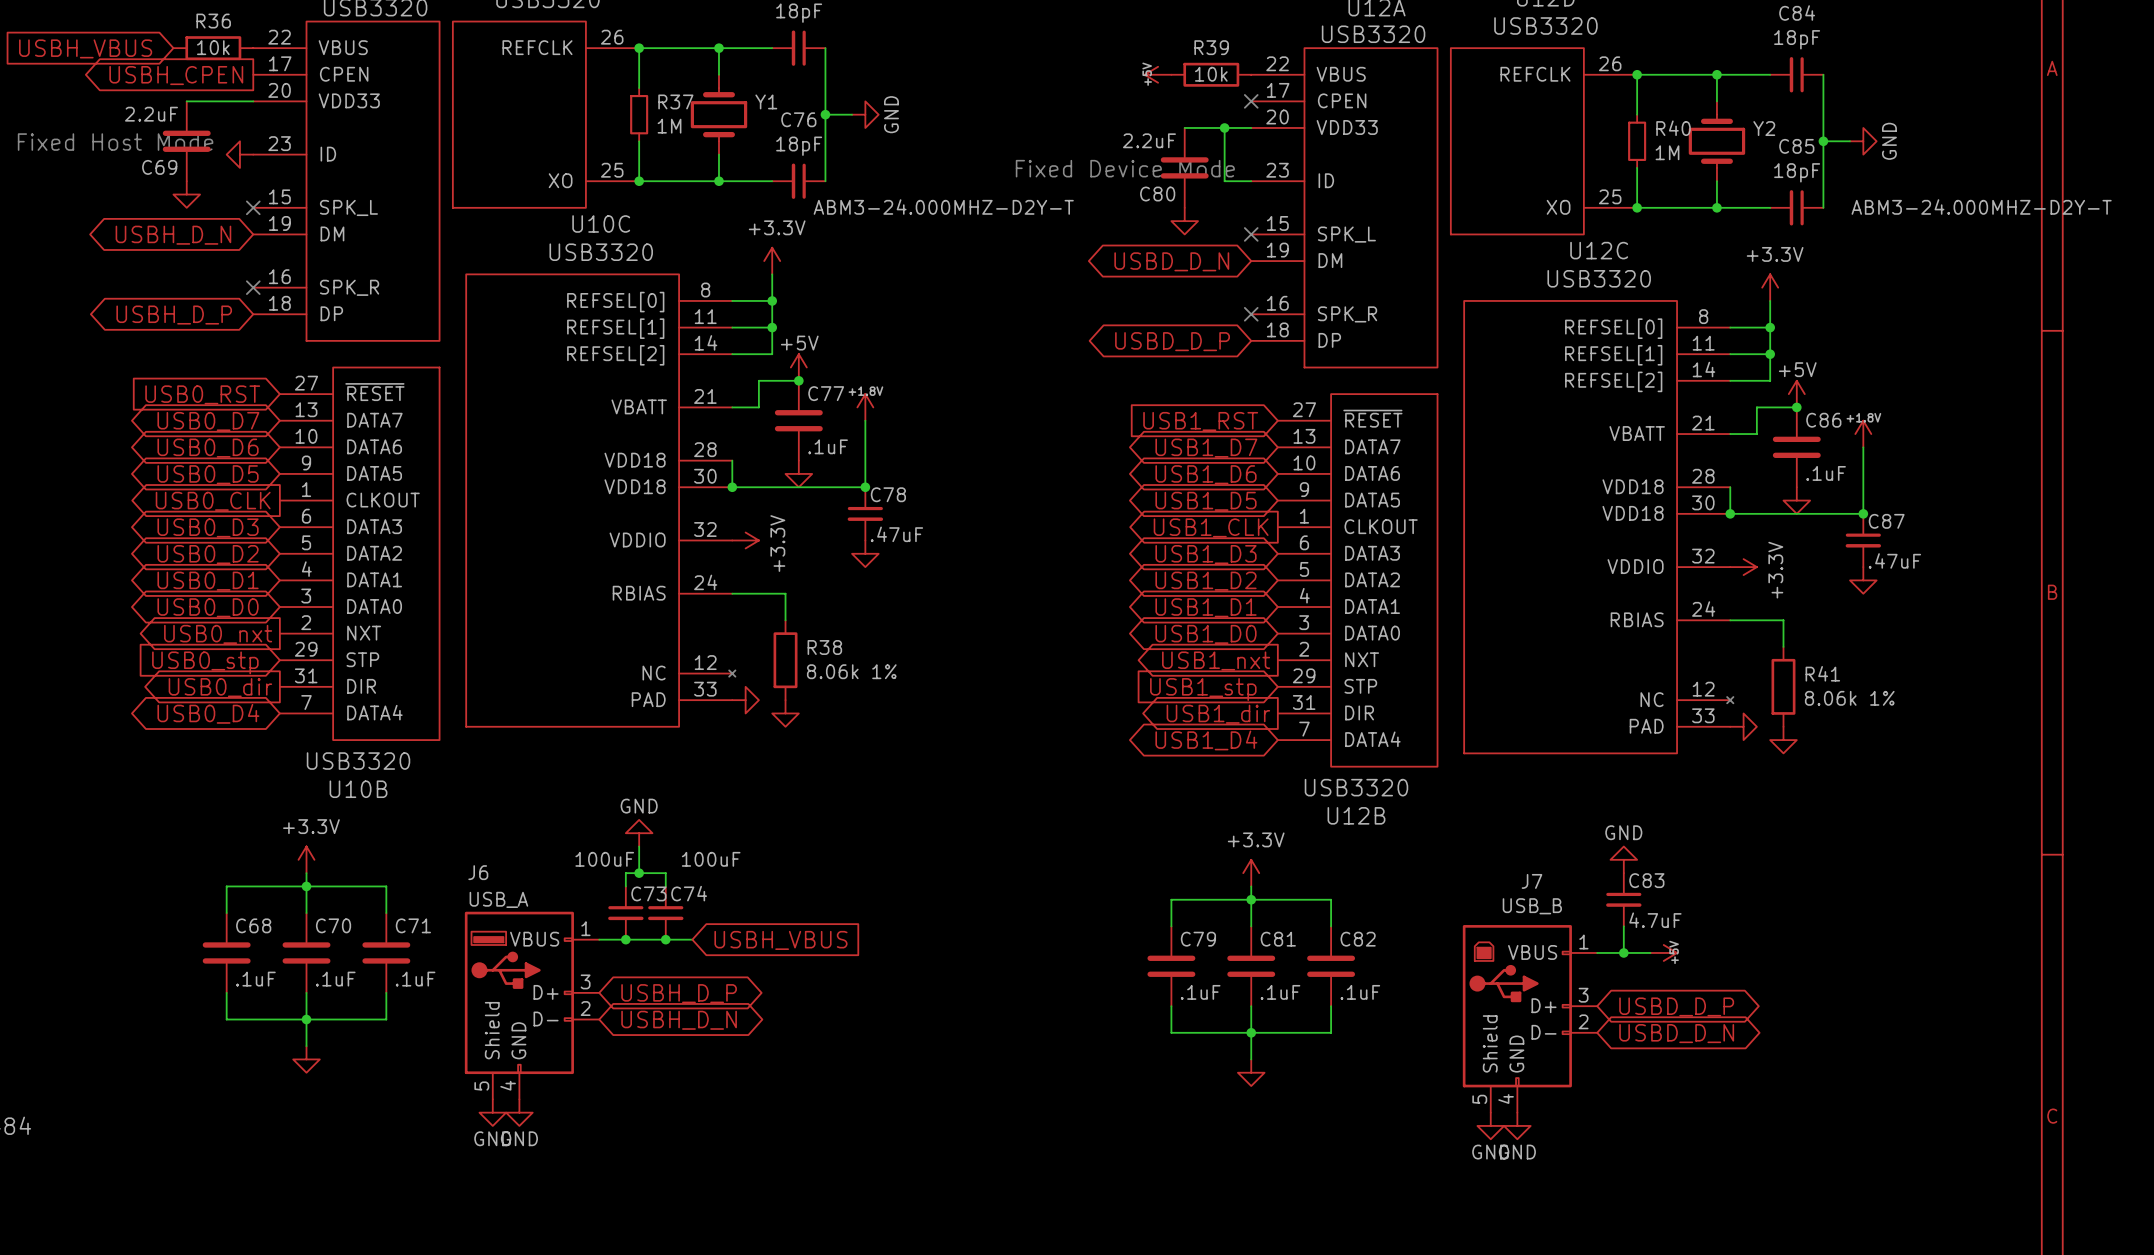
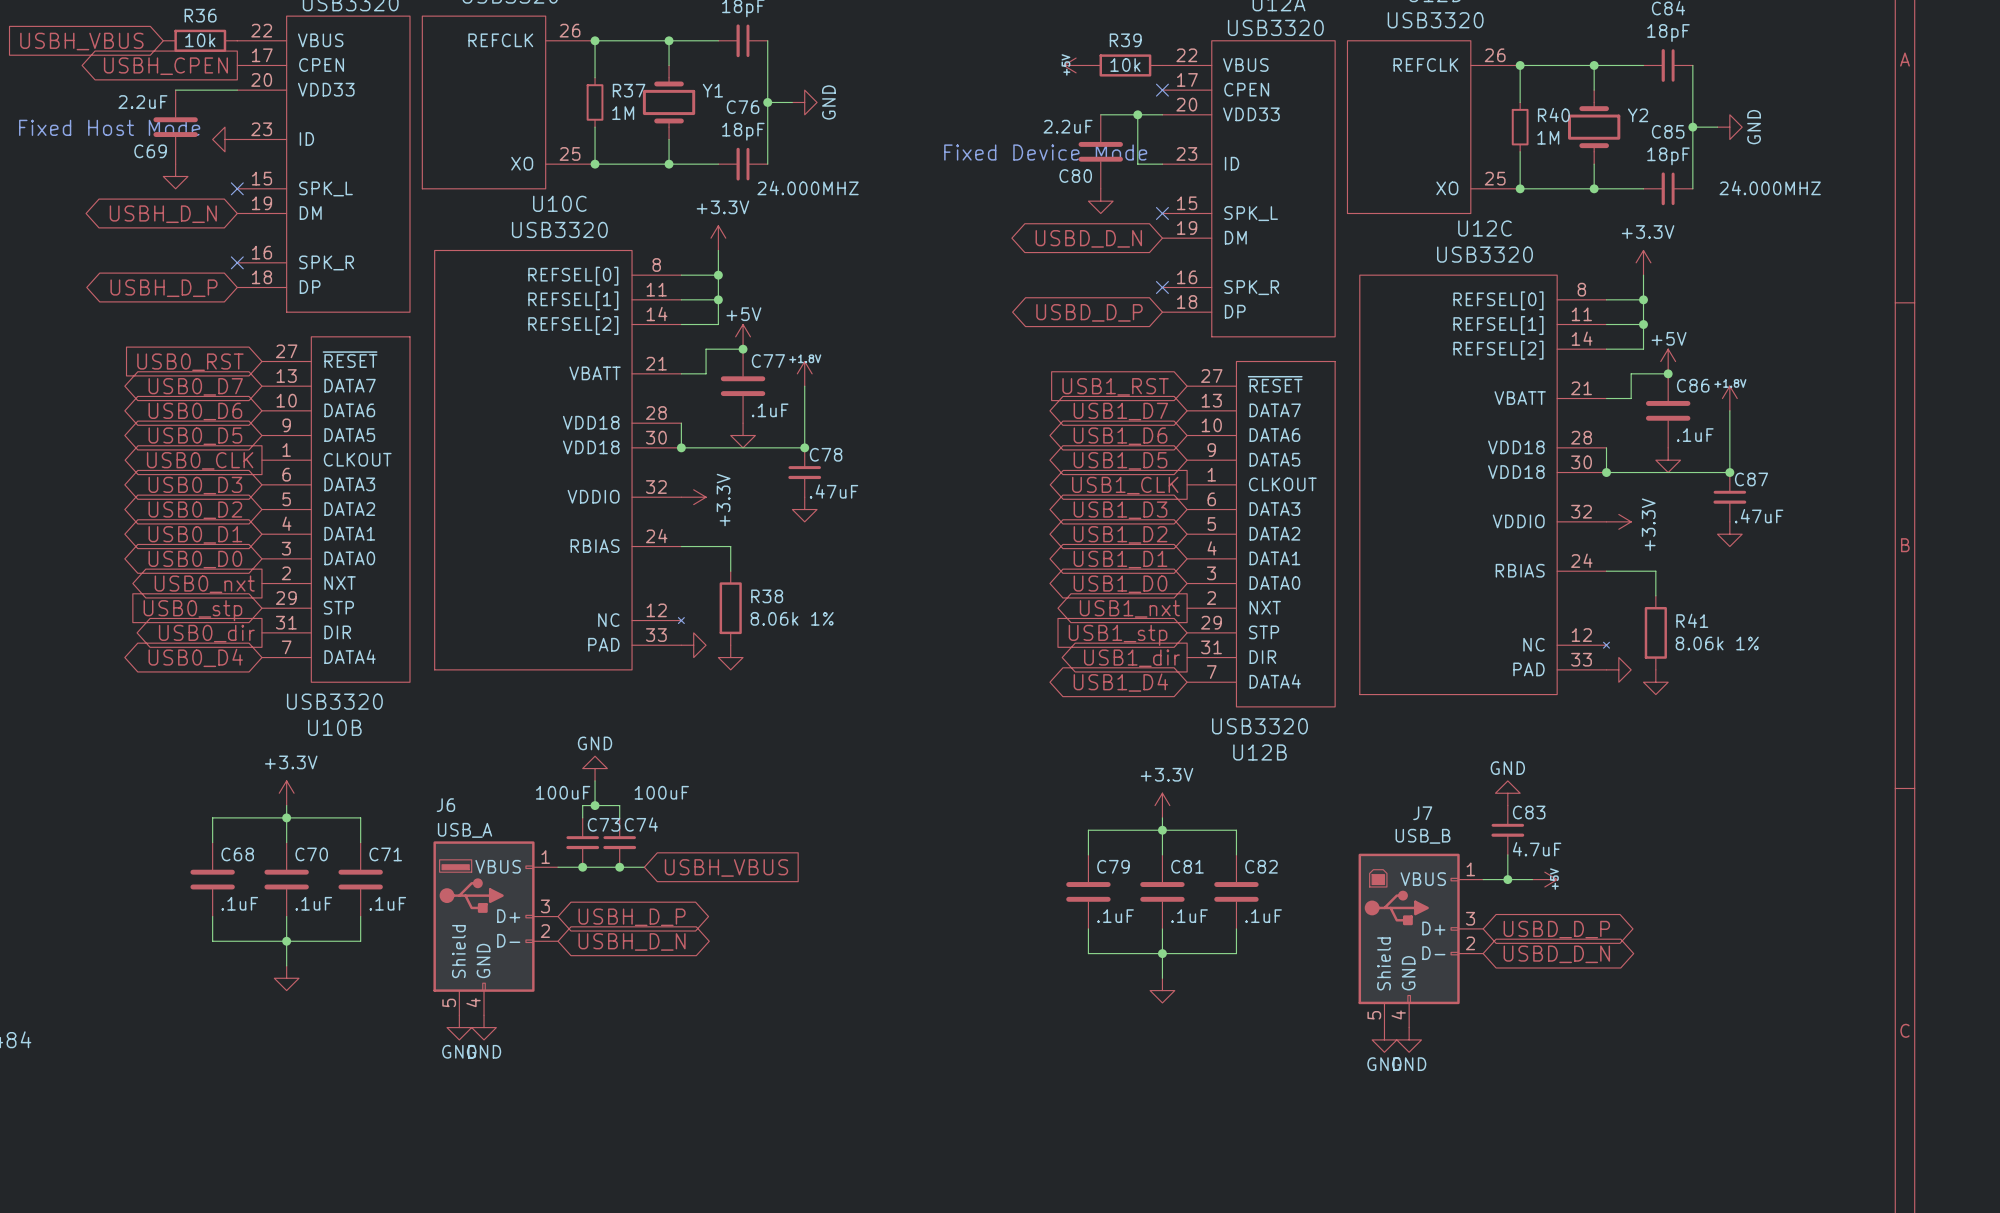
Y1 value: ABM3-24.000MHZ-D2Y-T (943, 207) -> 24.000MHZ (808, 188)
Y2 value: ABM3-24.000MHZ-D2Y-T (1981, 207) -> 24.000MHZ (1770, 188)

